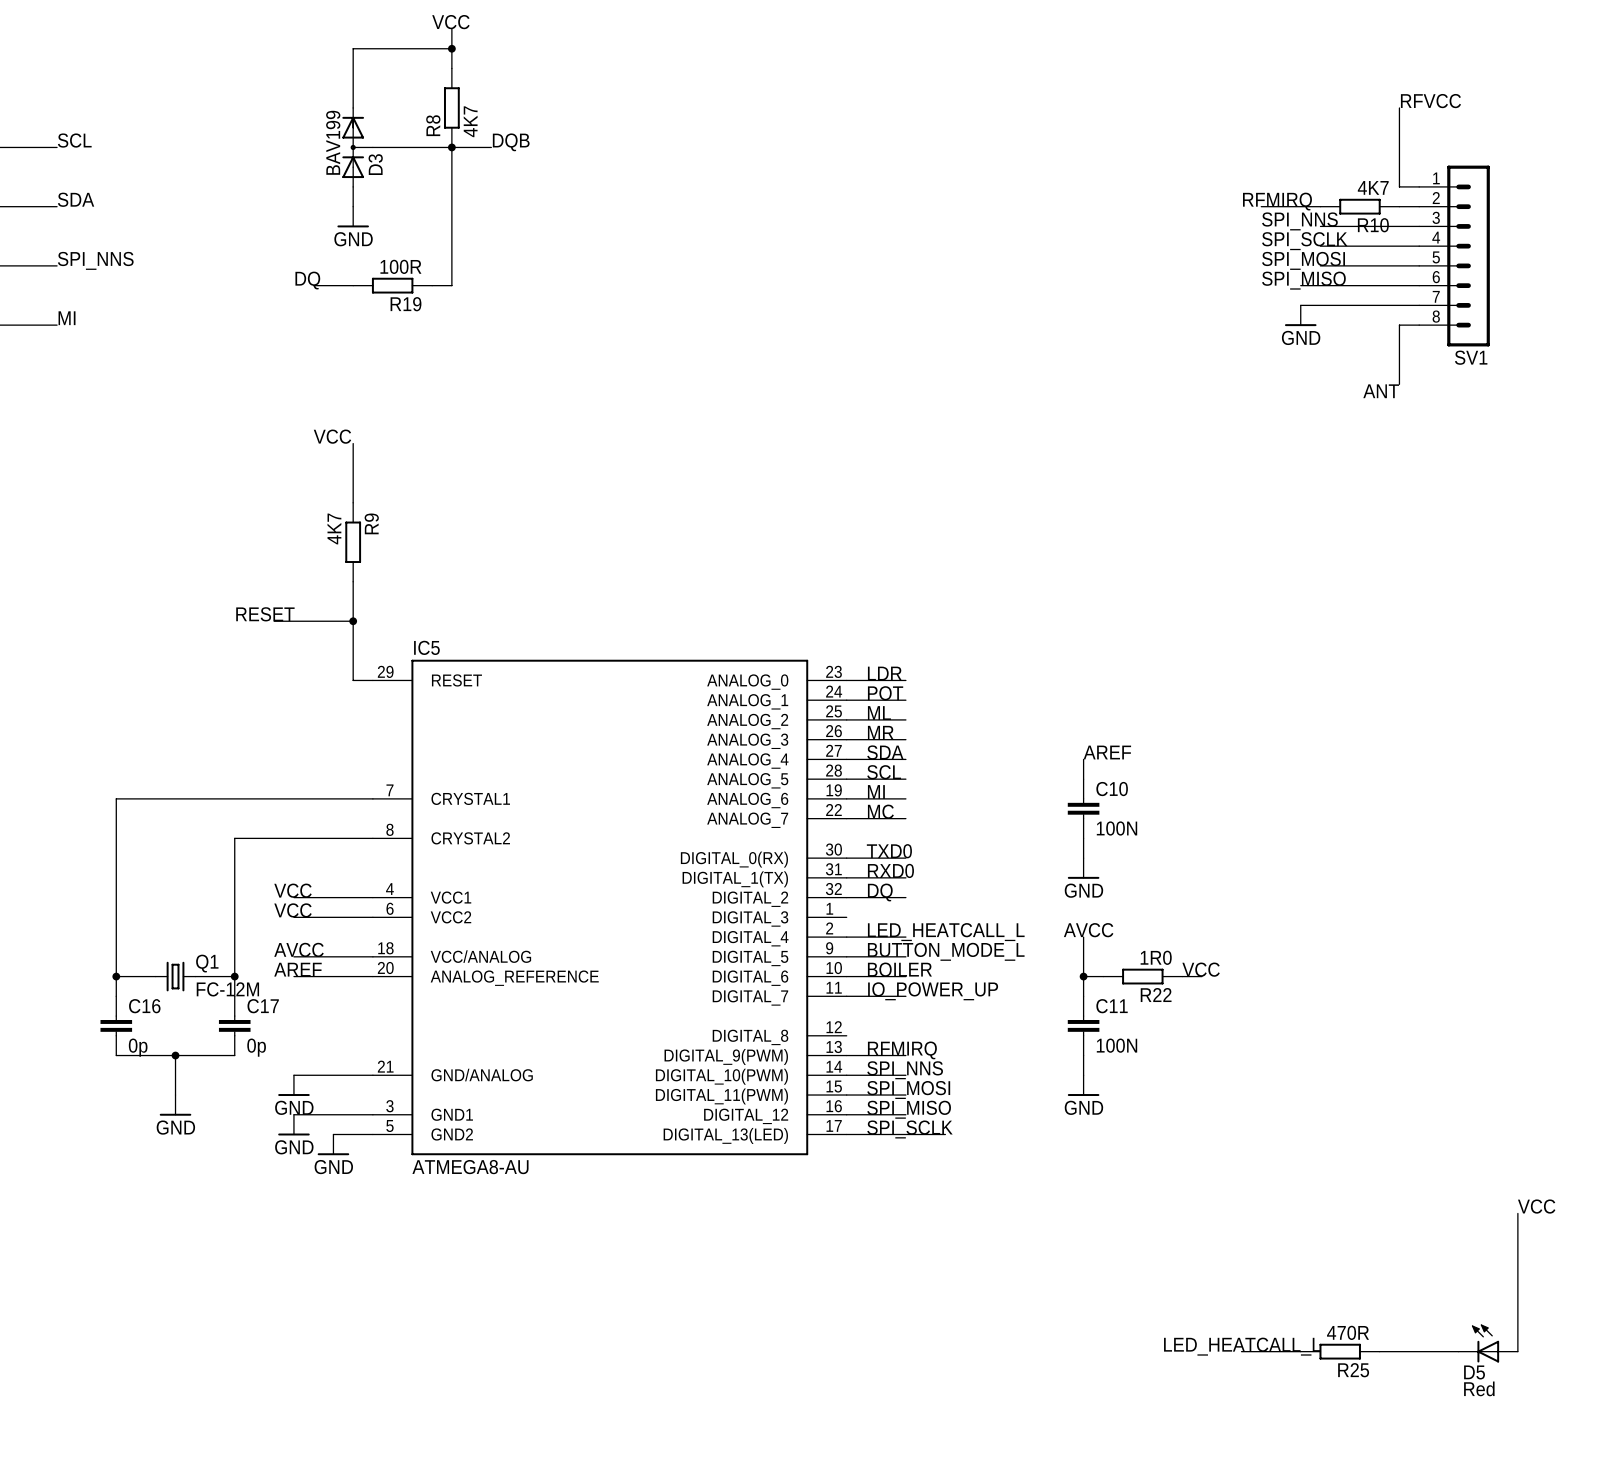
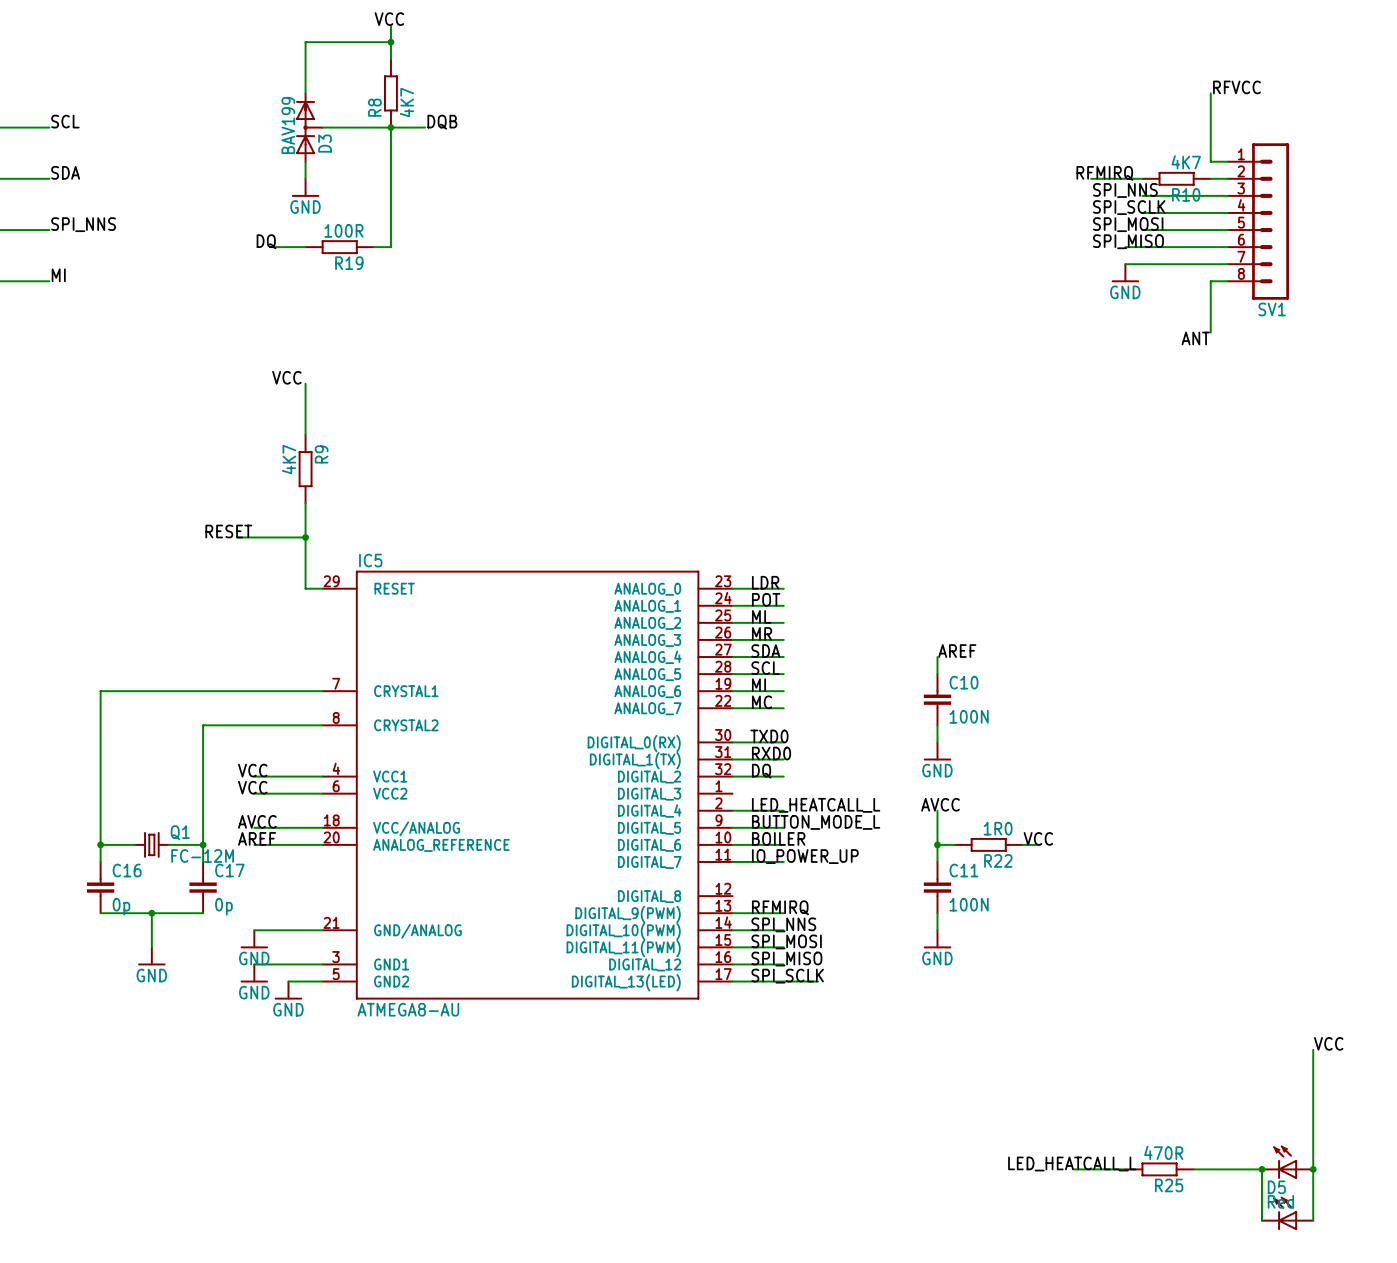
wire: none -> (1261, 1169) (1261, 1220)
junction: none -> (1261, 1169)
wire: none -> (1313, 1169) (1313, 1220)
junction: none -> (1313, 1169)
part: none -> (1287, 1213)

